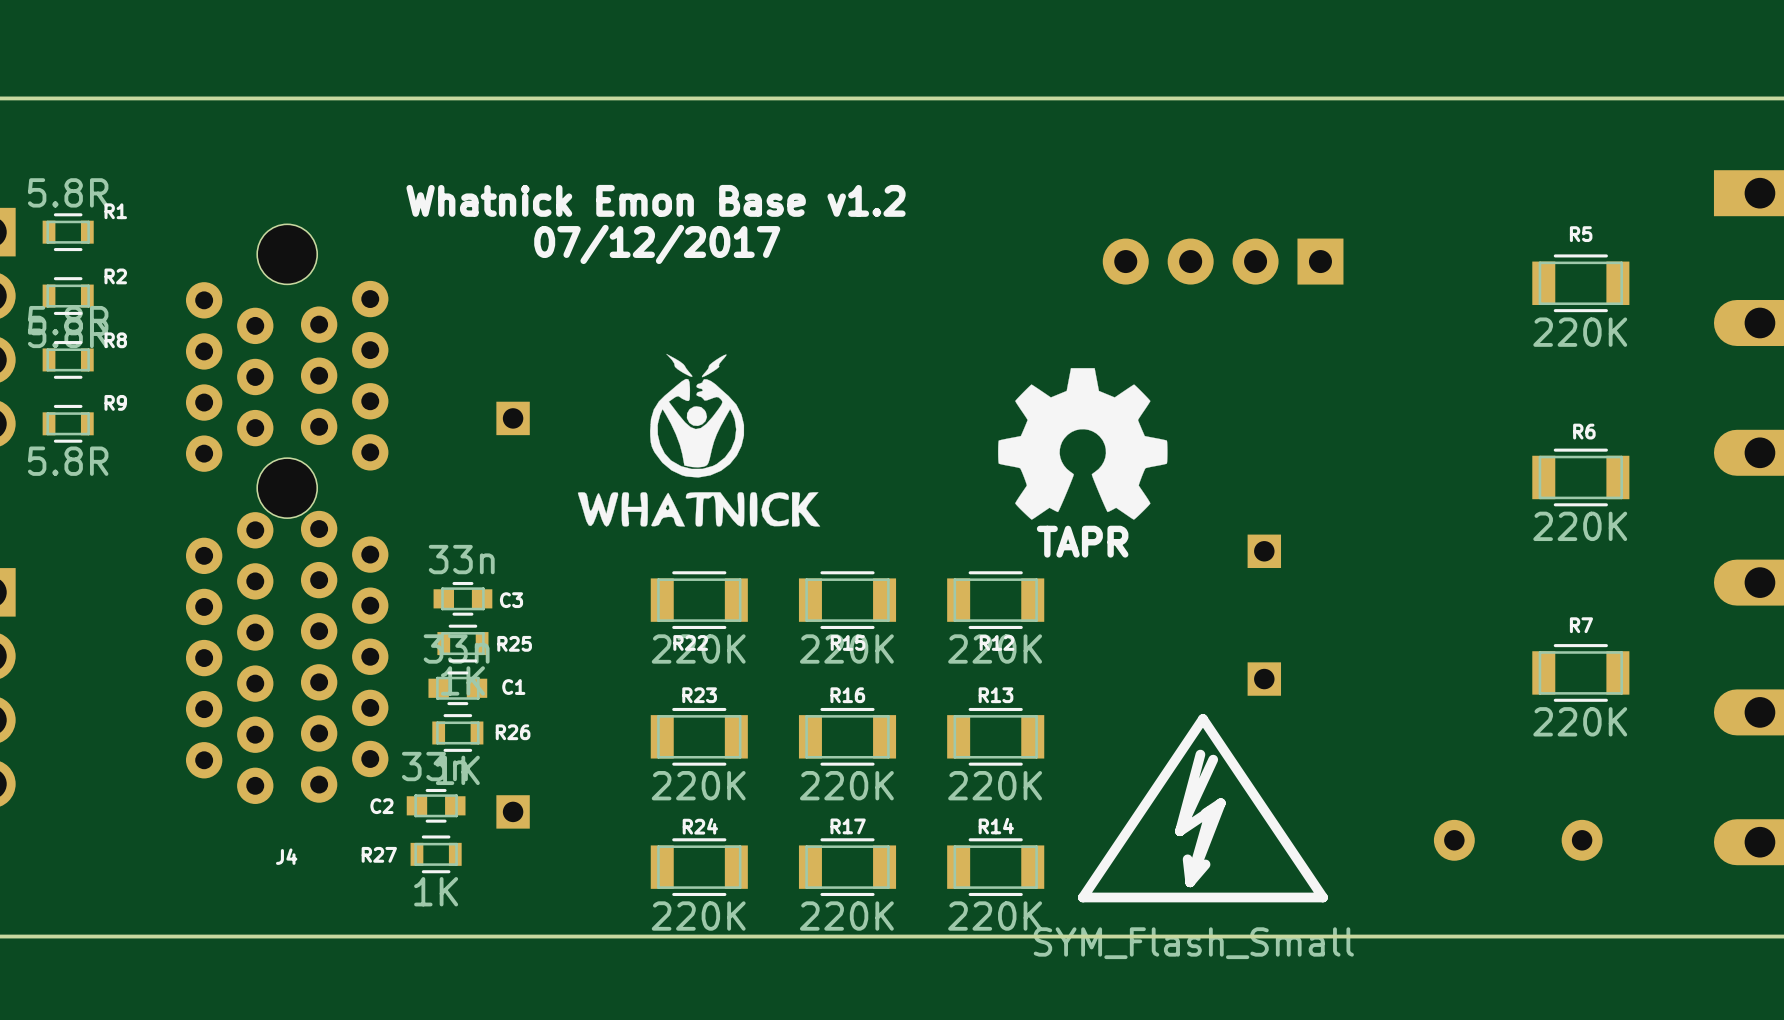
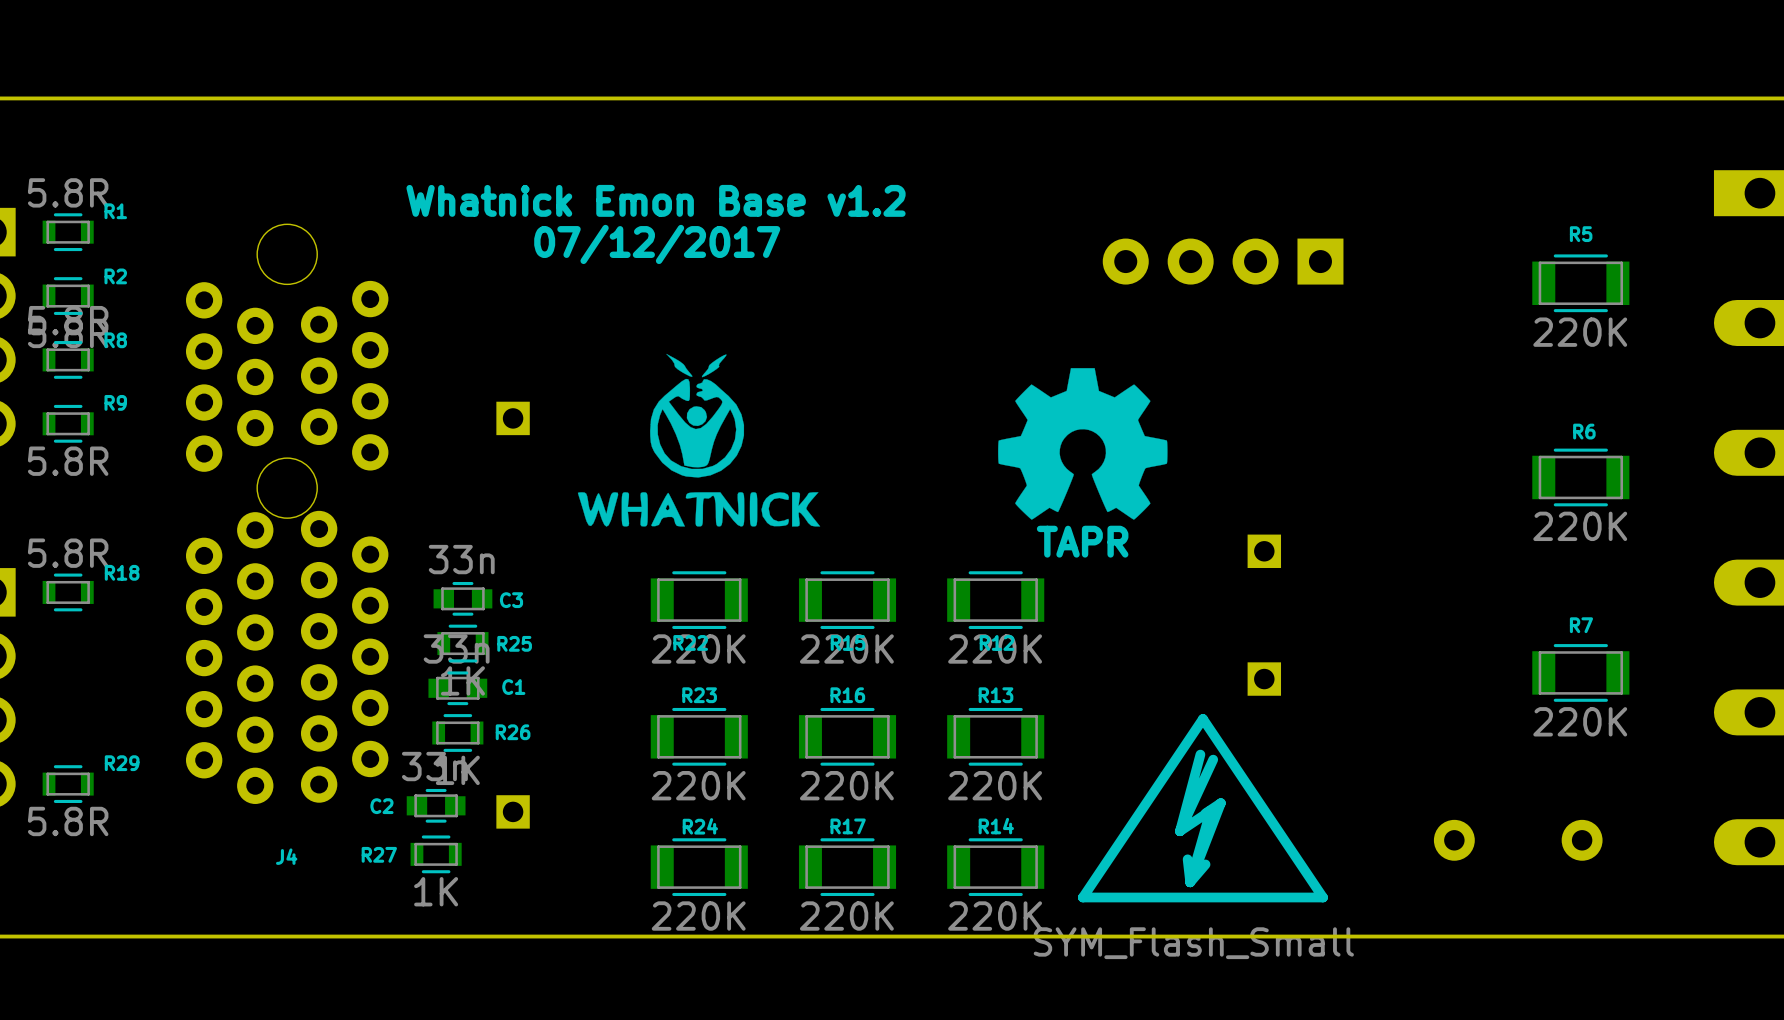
R18: none -> 5.8R (68, 592)
R29: none -> 5.8R (68, 784)

